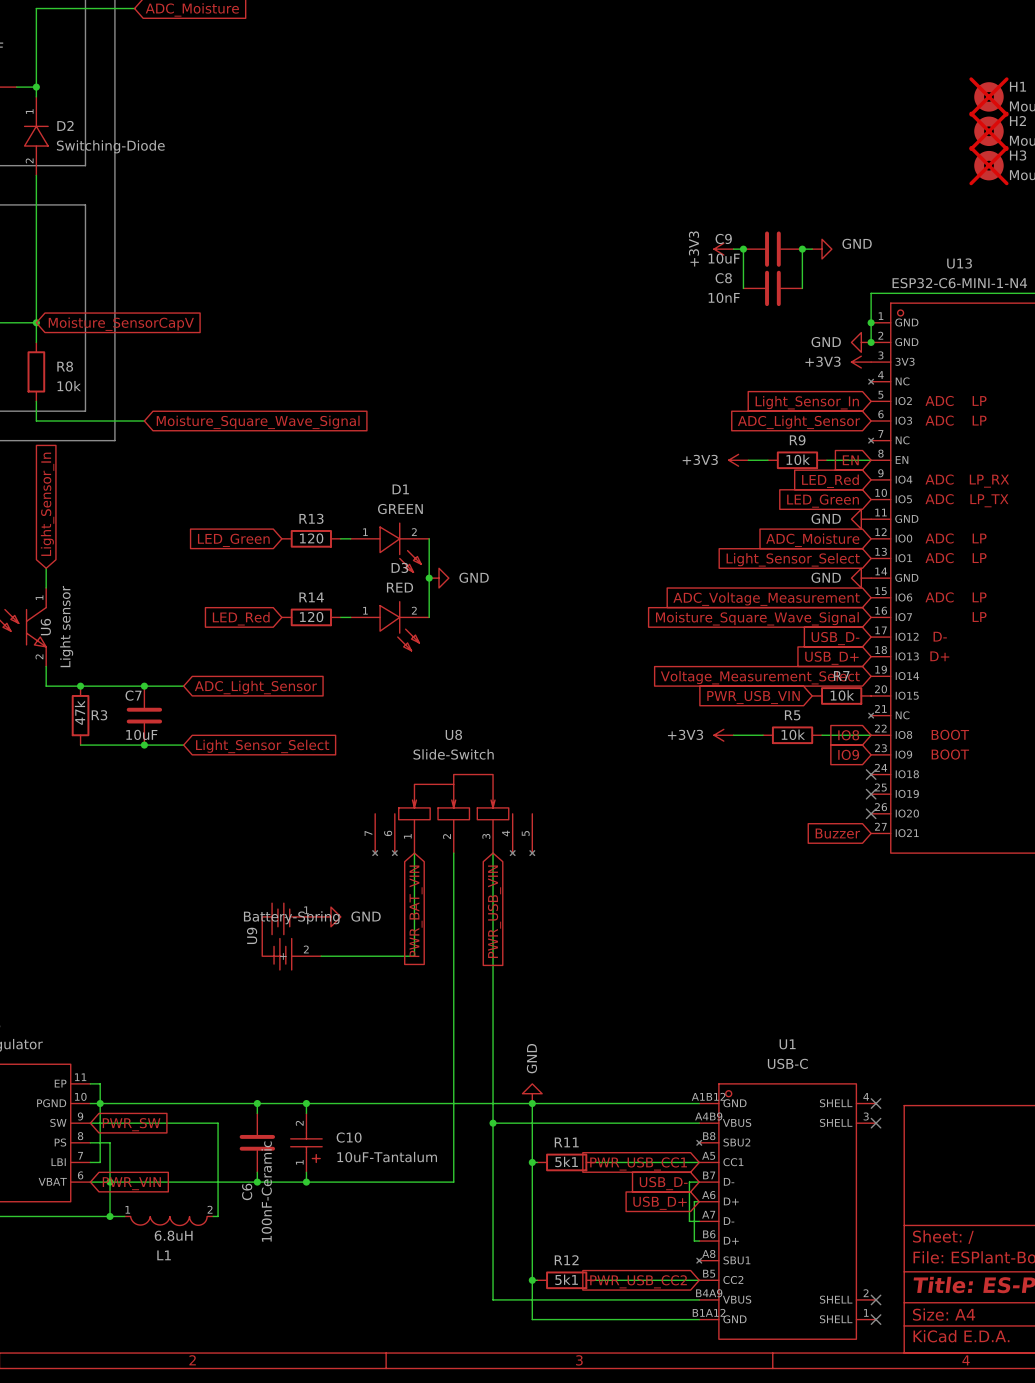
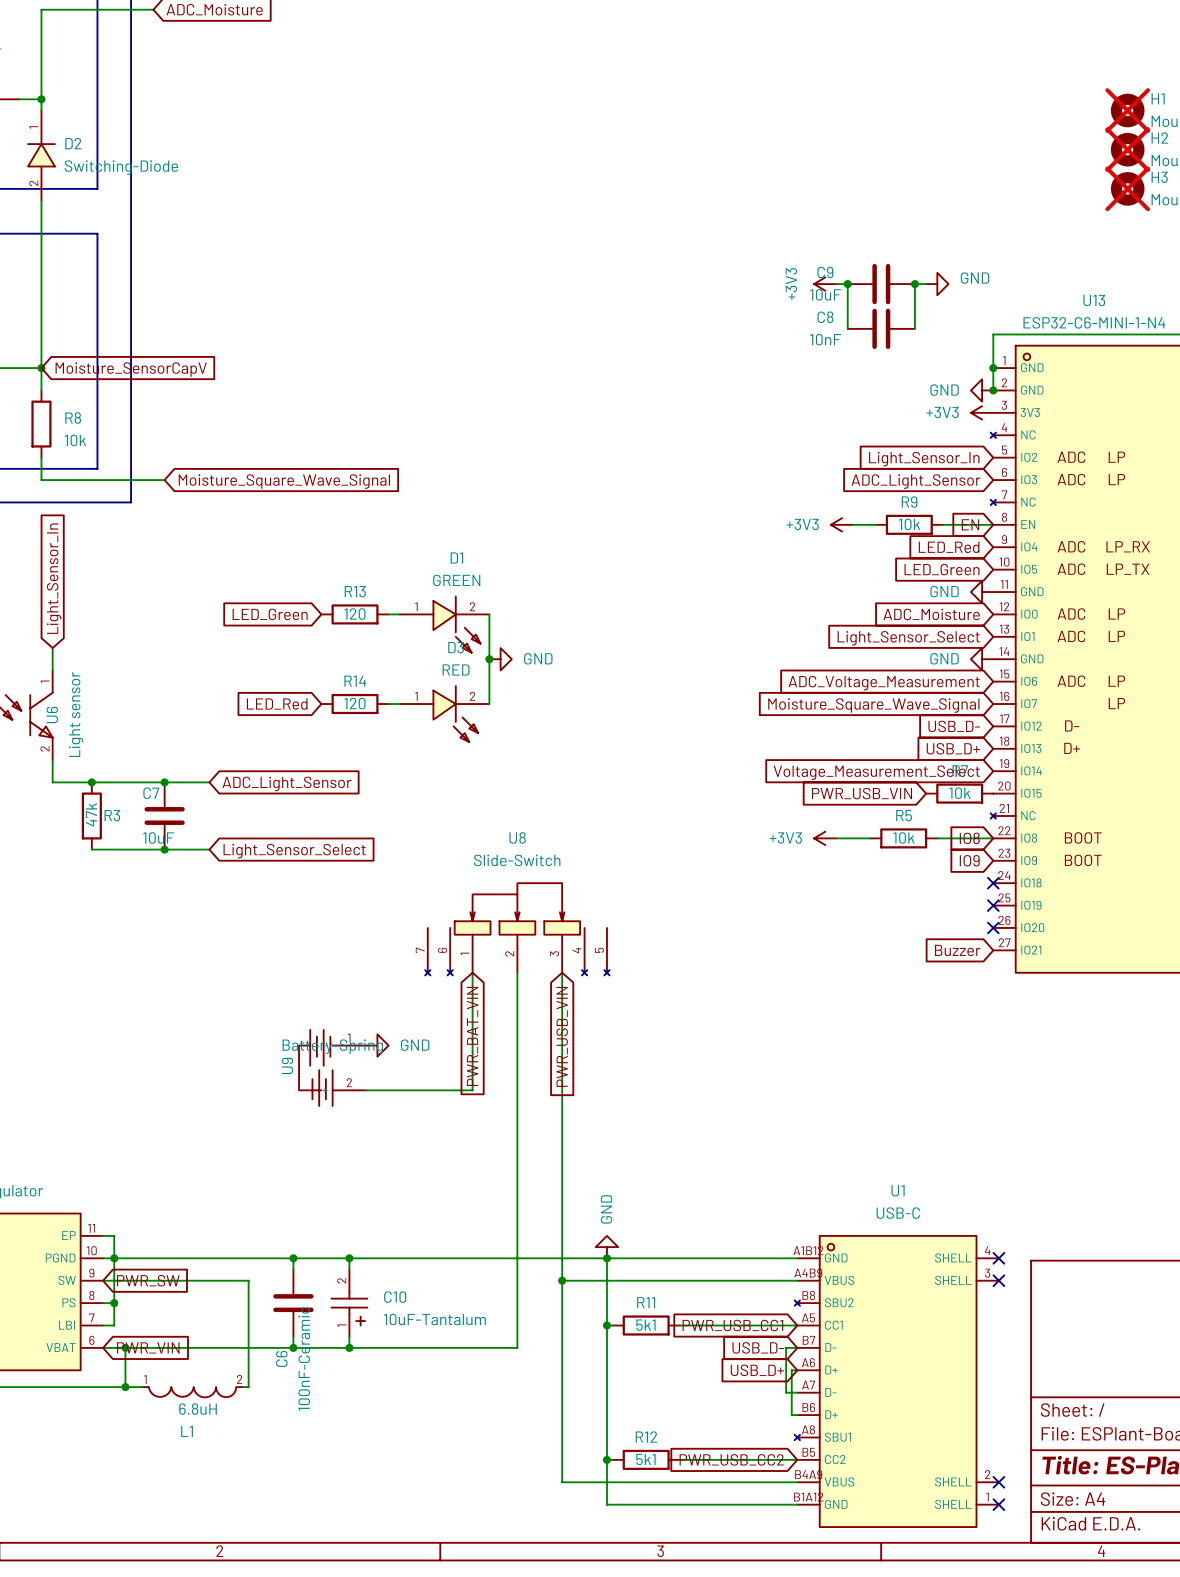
wire: (100, 1142) (110, 1142) (110, 1182) -> none
junction: none -> (114, 1303)

